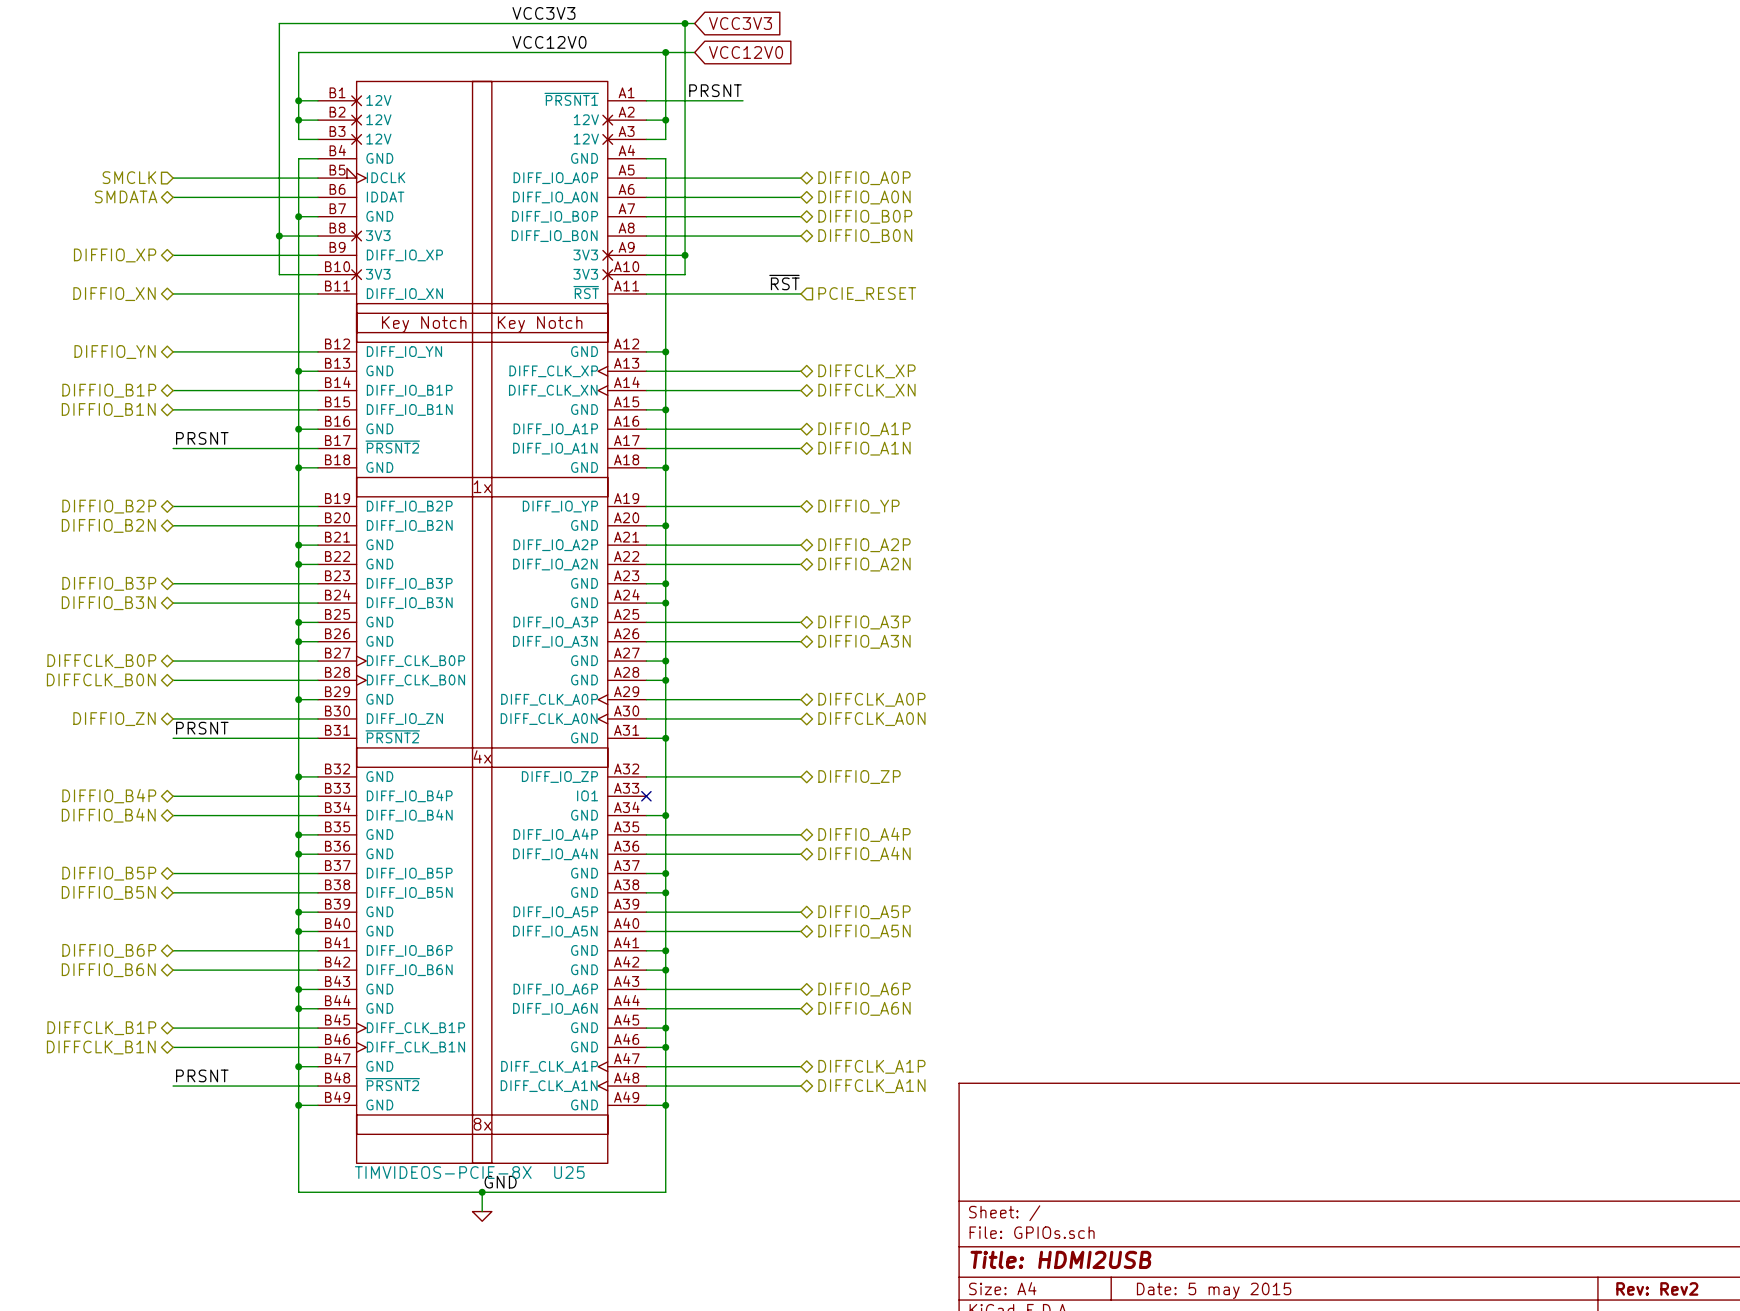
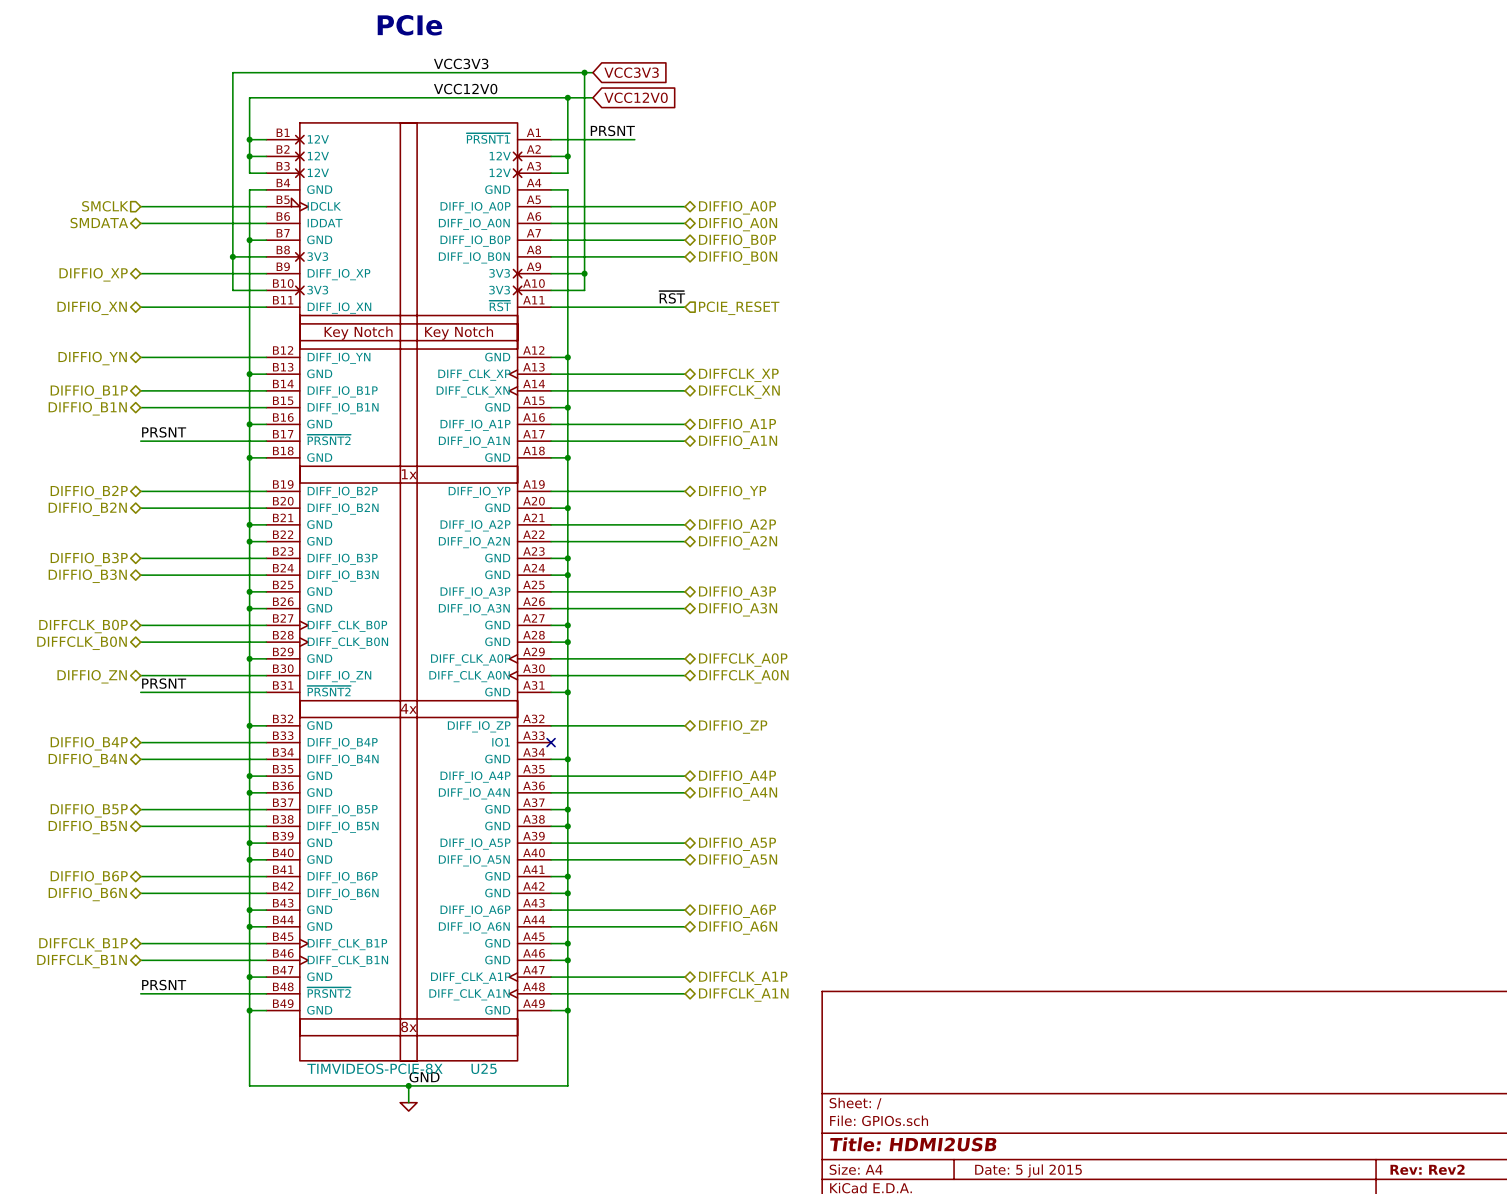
title block: Date: 5 may 2015 (1214, 1290) -> Date: 5 jul 2015 (1028, 1170)

